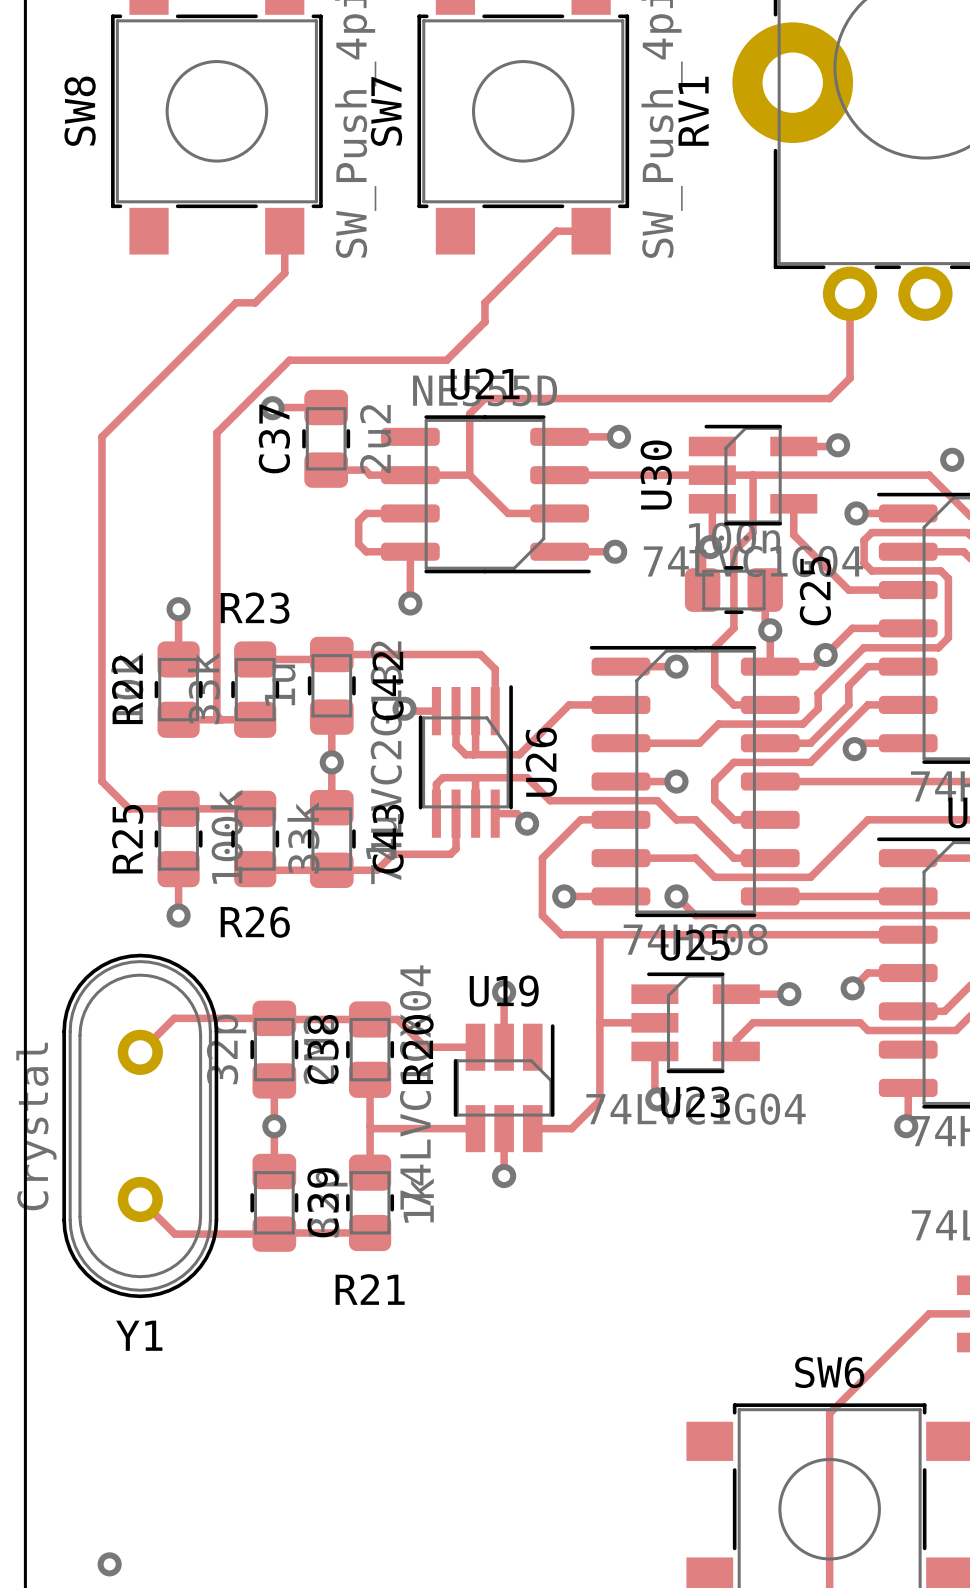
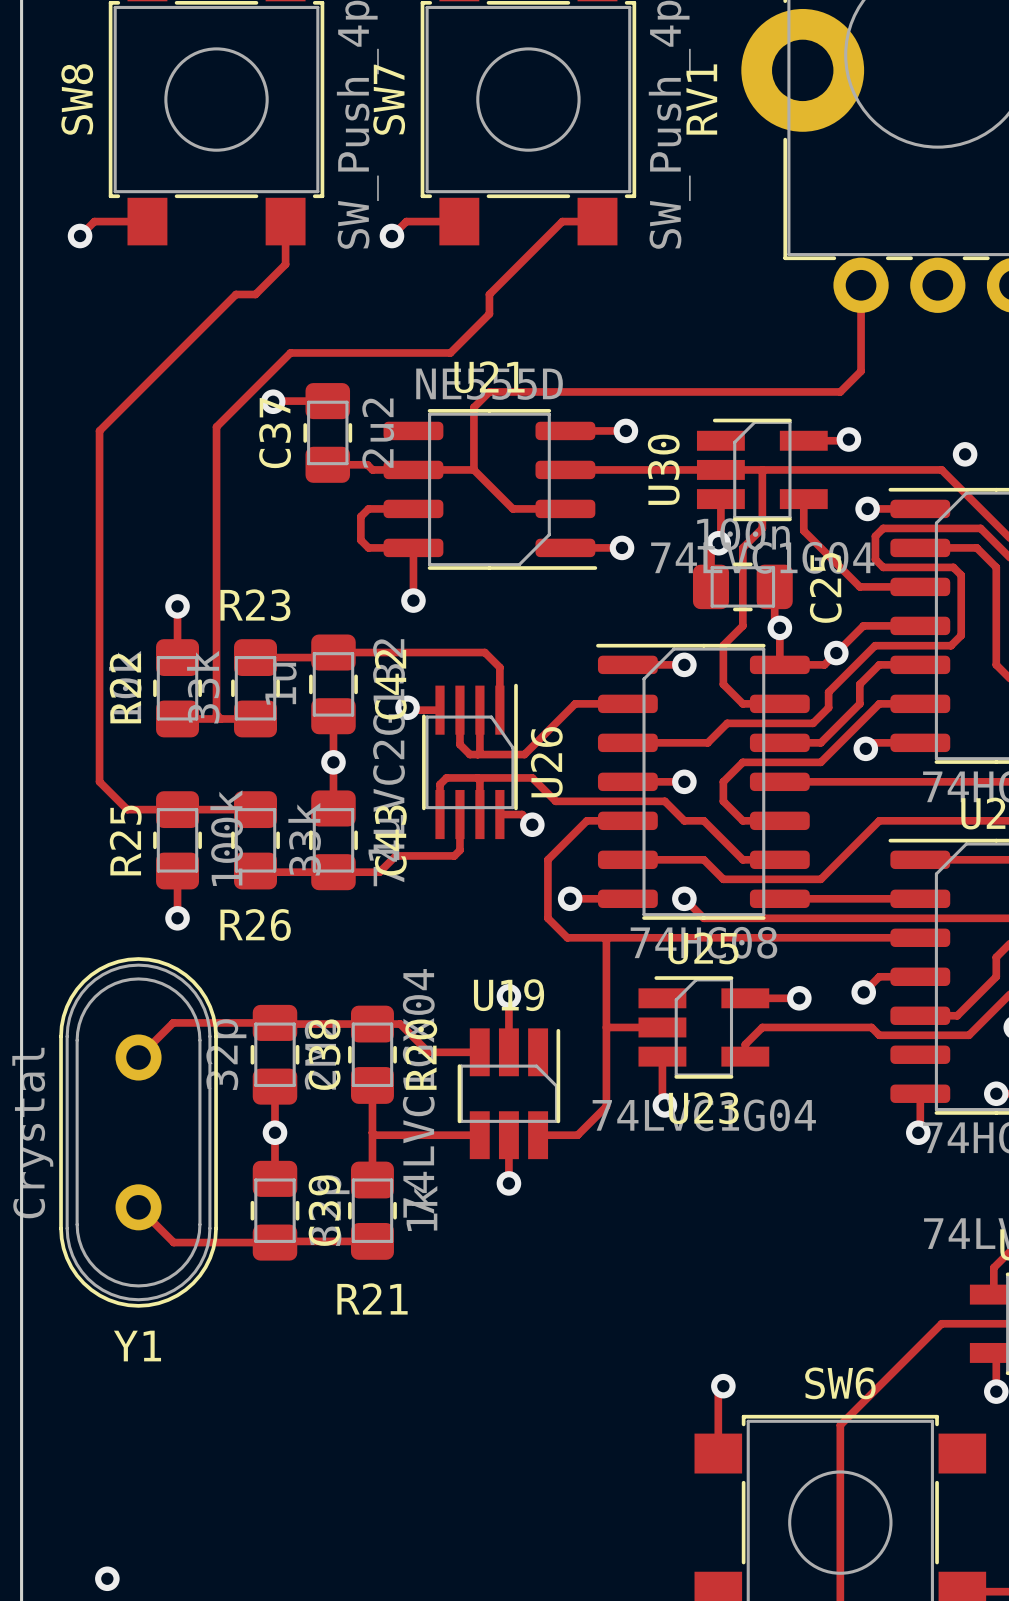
track: none -> (147, 221) (94, 221) (80, 236)
track: none -> (459, 221) (406, 221) (391, 236)
via: none -> (80, 236)
via: none -> (391, 236)
track: none -> (723, 1386) (718, 1391) (718, 1453)
via: none -> (723, 1386)

